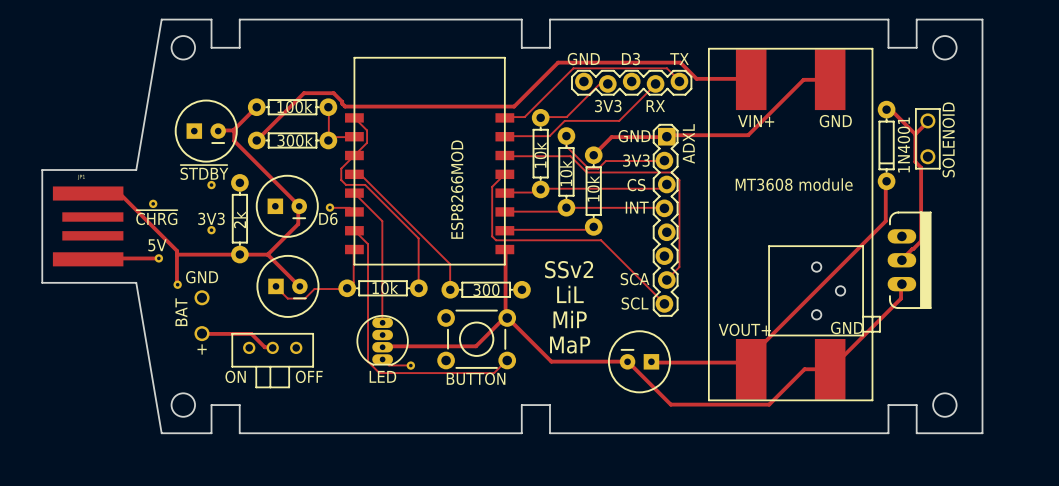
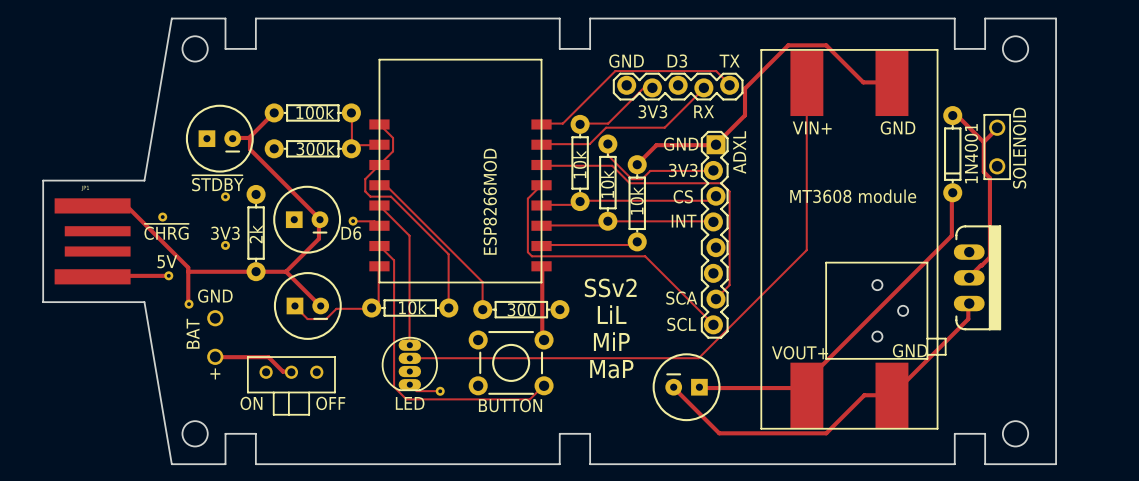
track: (751, 79) (696, 78) (680, 62) (558, 62) (514, 106) (345, 106) (333, 93) (304, 93) (256, 140) -> (806, 83) (806, 250) (698, 358) (409, 358)
track: (830, 79) (803, 79) (748, 135) (667, 135) -> (891, 83) (863, 82) (826, 45) (788, 45) (745, 88) (745, 115) (717, 143)
track: (382, 347) (475, 346) (504, 317) (507, 317) (551, 361) (627, 361) (670, 404) -> (673, 387) (720, 433)

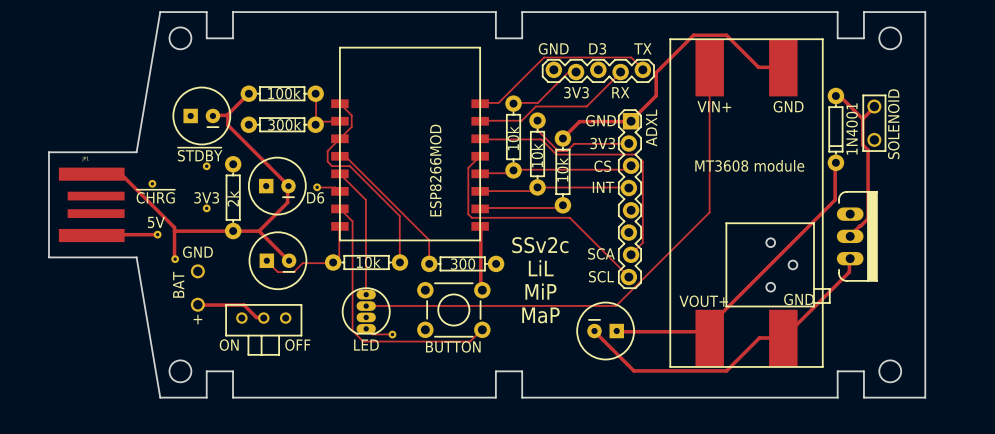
text: SSv2 (610, 287) -> SSv2c (540, 245)

